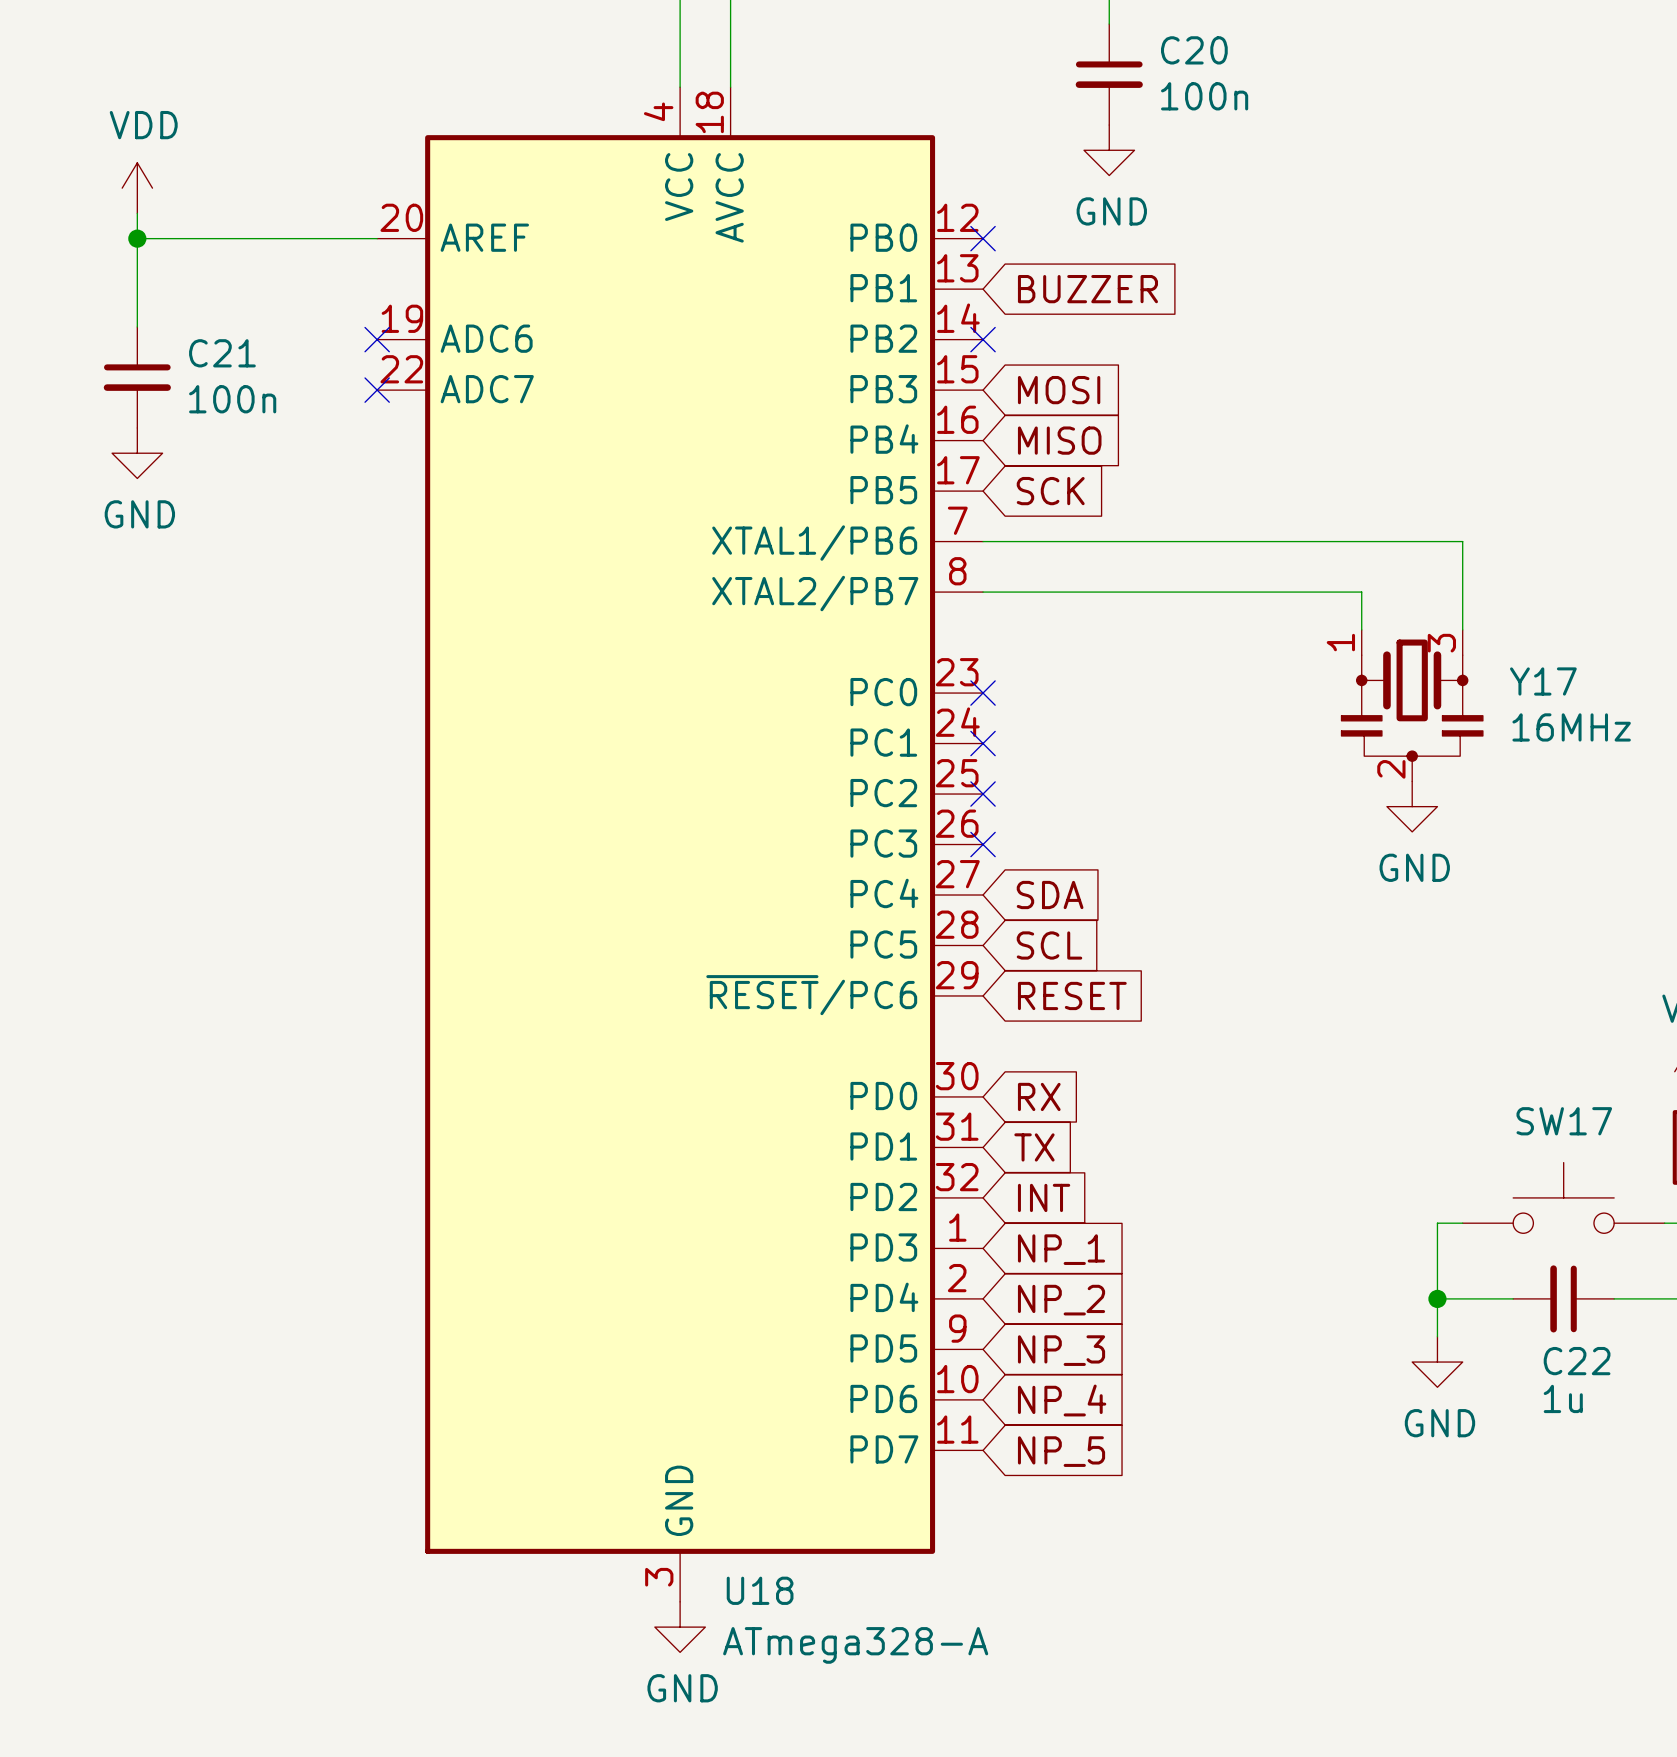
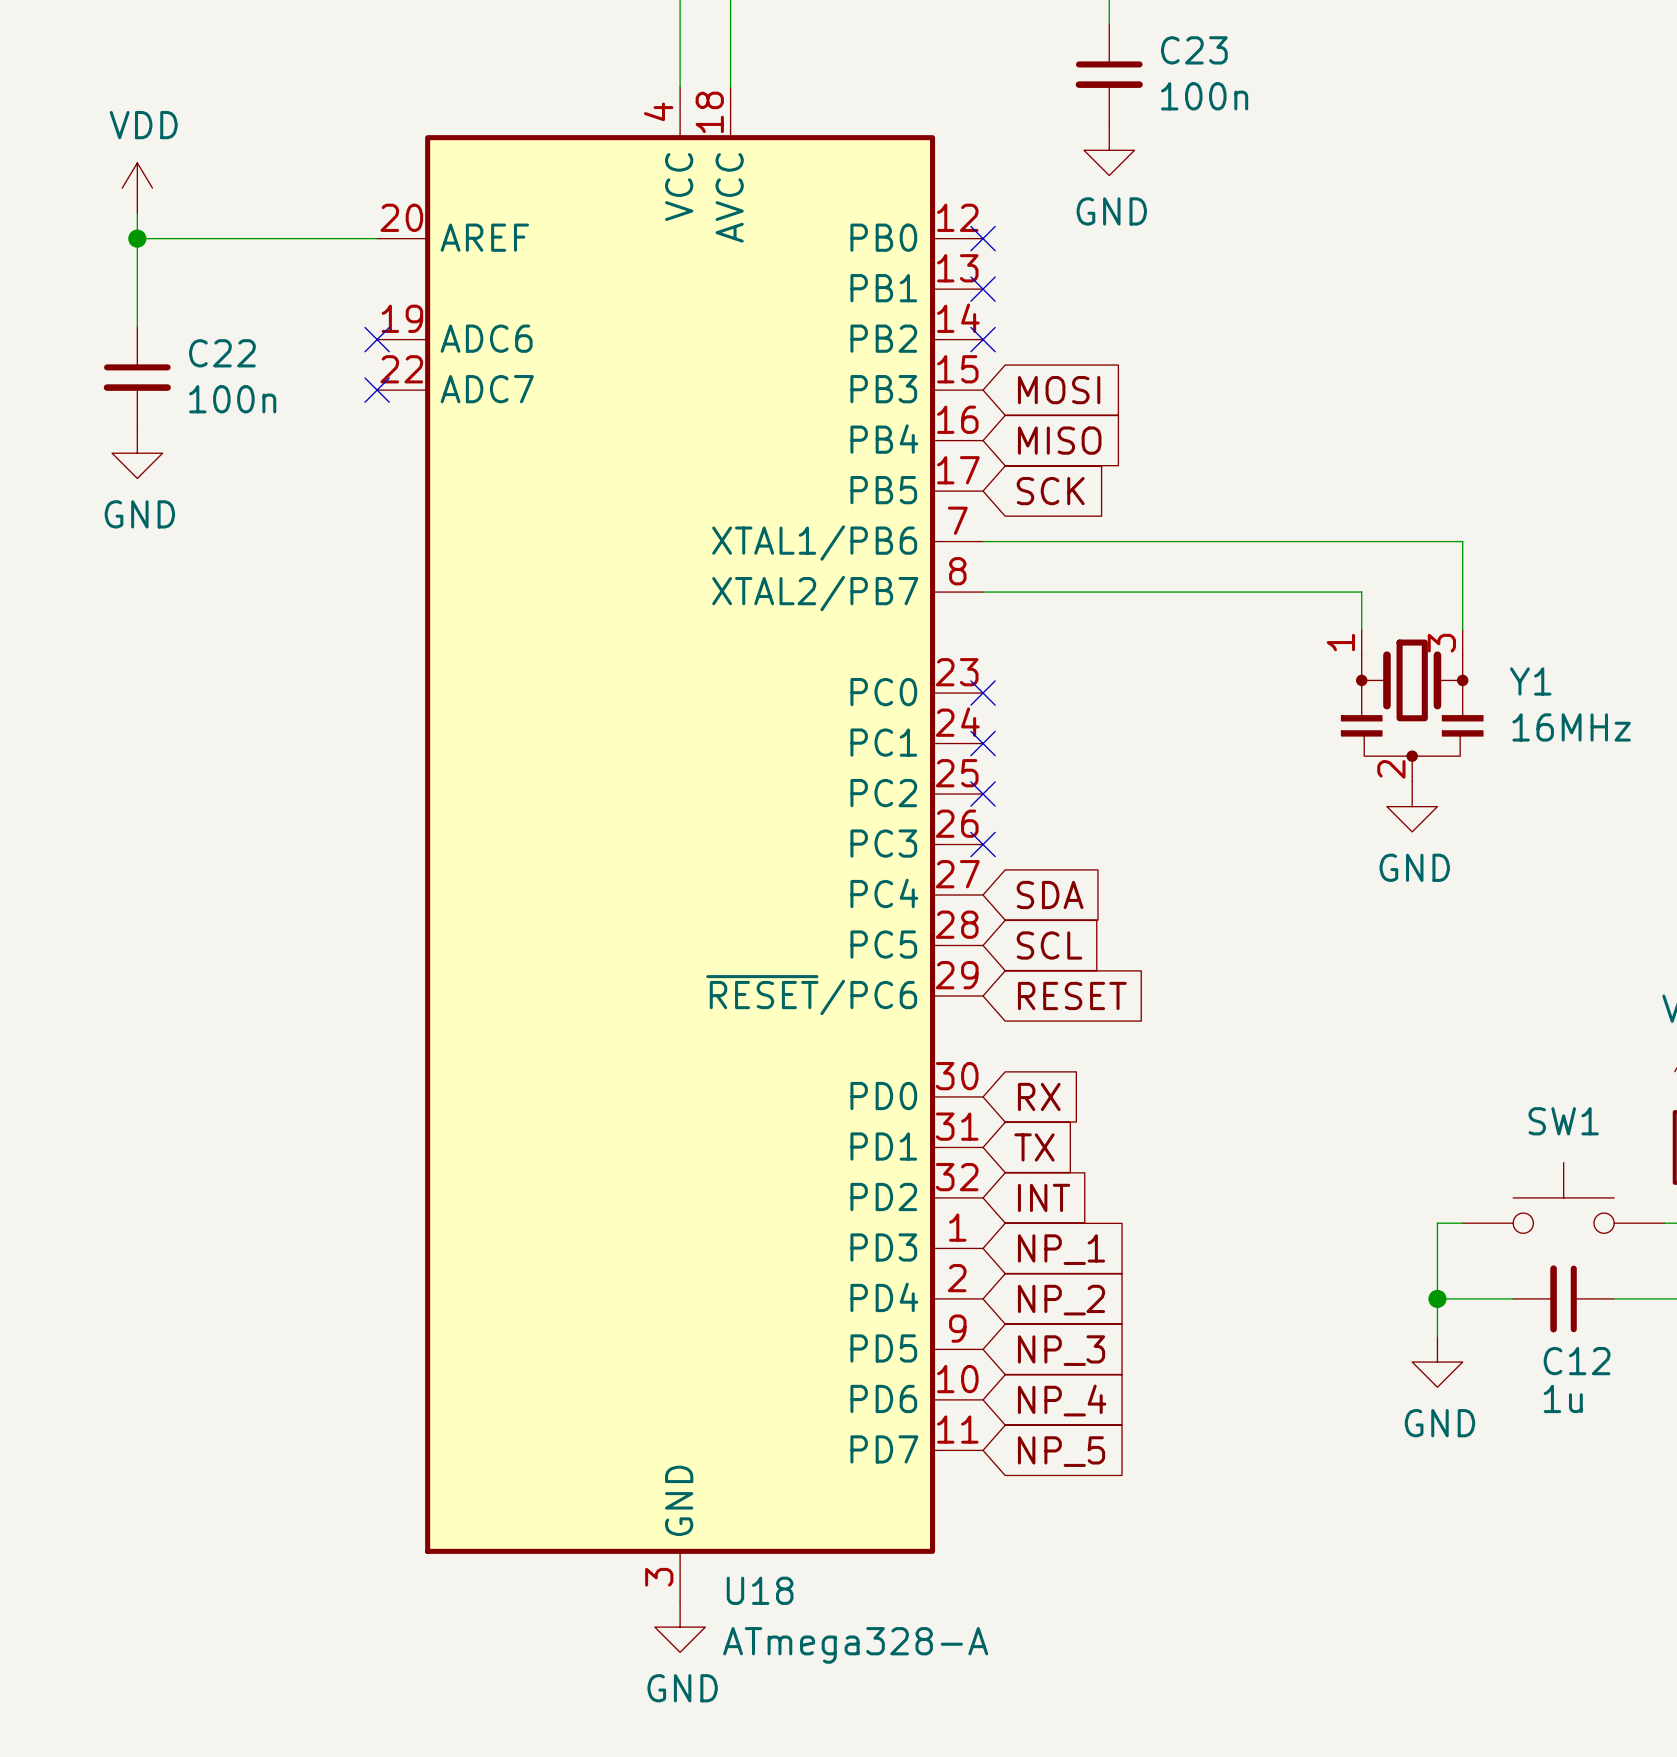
C20 name: C20 (1194, 50) -> C23 (1194, 50)
no-connect mark: none -> (983, 289)
global label: BUZZER (1087, 289) -> none
C21 name: C21 (222, 353) -> C22 (222, 353)
Y17 name: Y17 (1543, 681) -> Y1 (1530, 681)
SW17 name: SW17 (1564, 1121) -> SW1 (1563, 1121)
C22 name: C22 (1577, 1361) -> C12 (1577, 1361)

